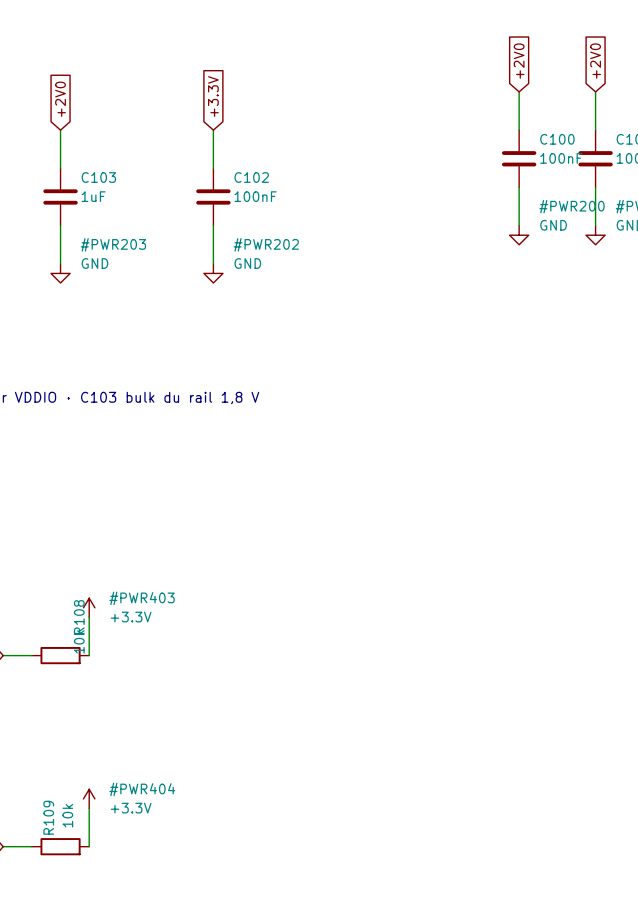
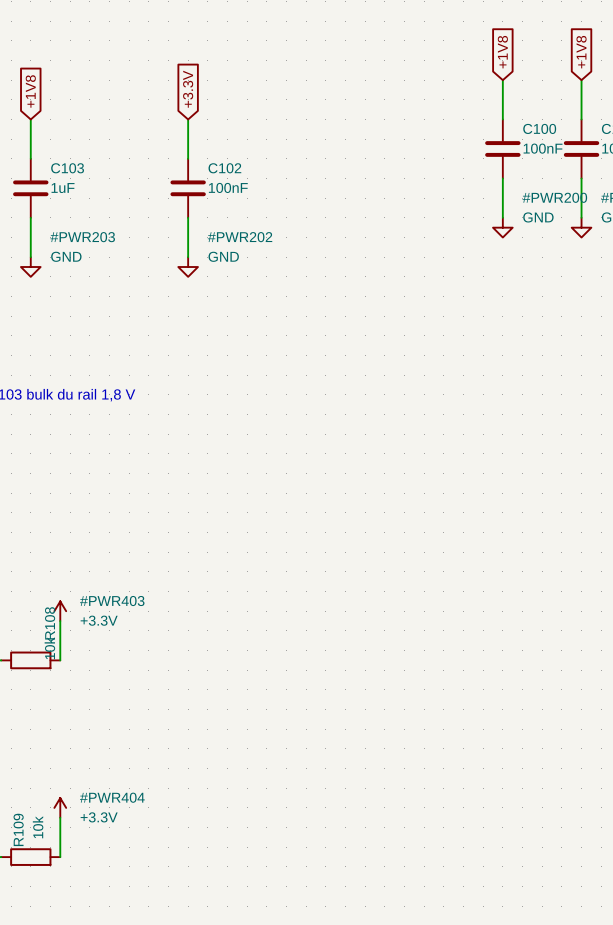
global label: +2V0 (519, 61) -> +1V8 (502, 52)
global label: +2V0 (595, 61) -> +1V8 (581, 52)
global label: +2V0 (60, 99) -> +1V8 (30, 91)

